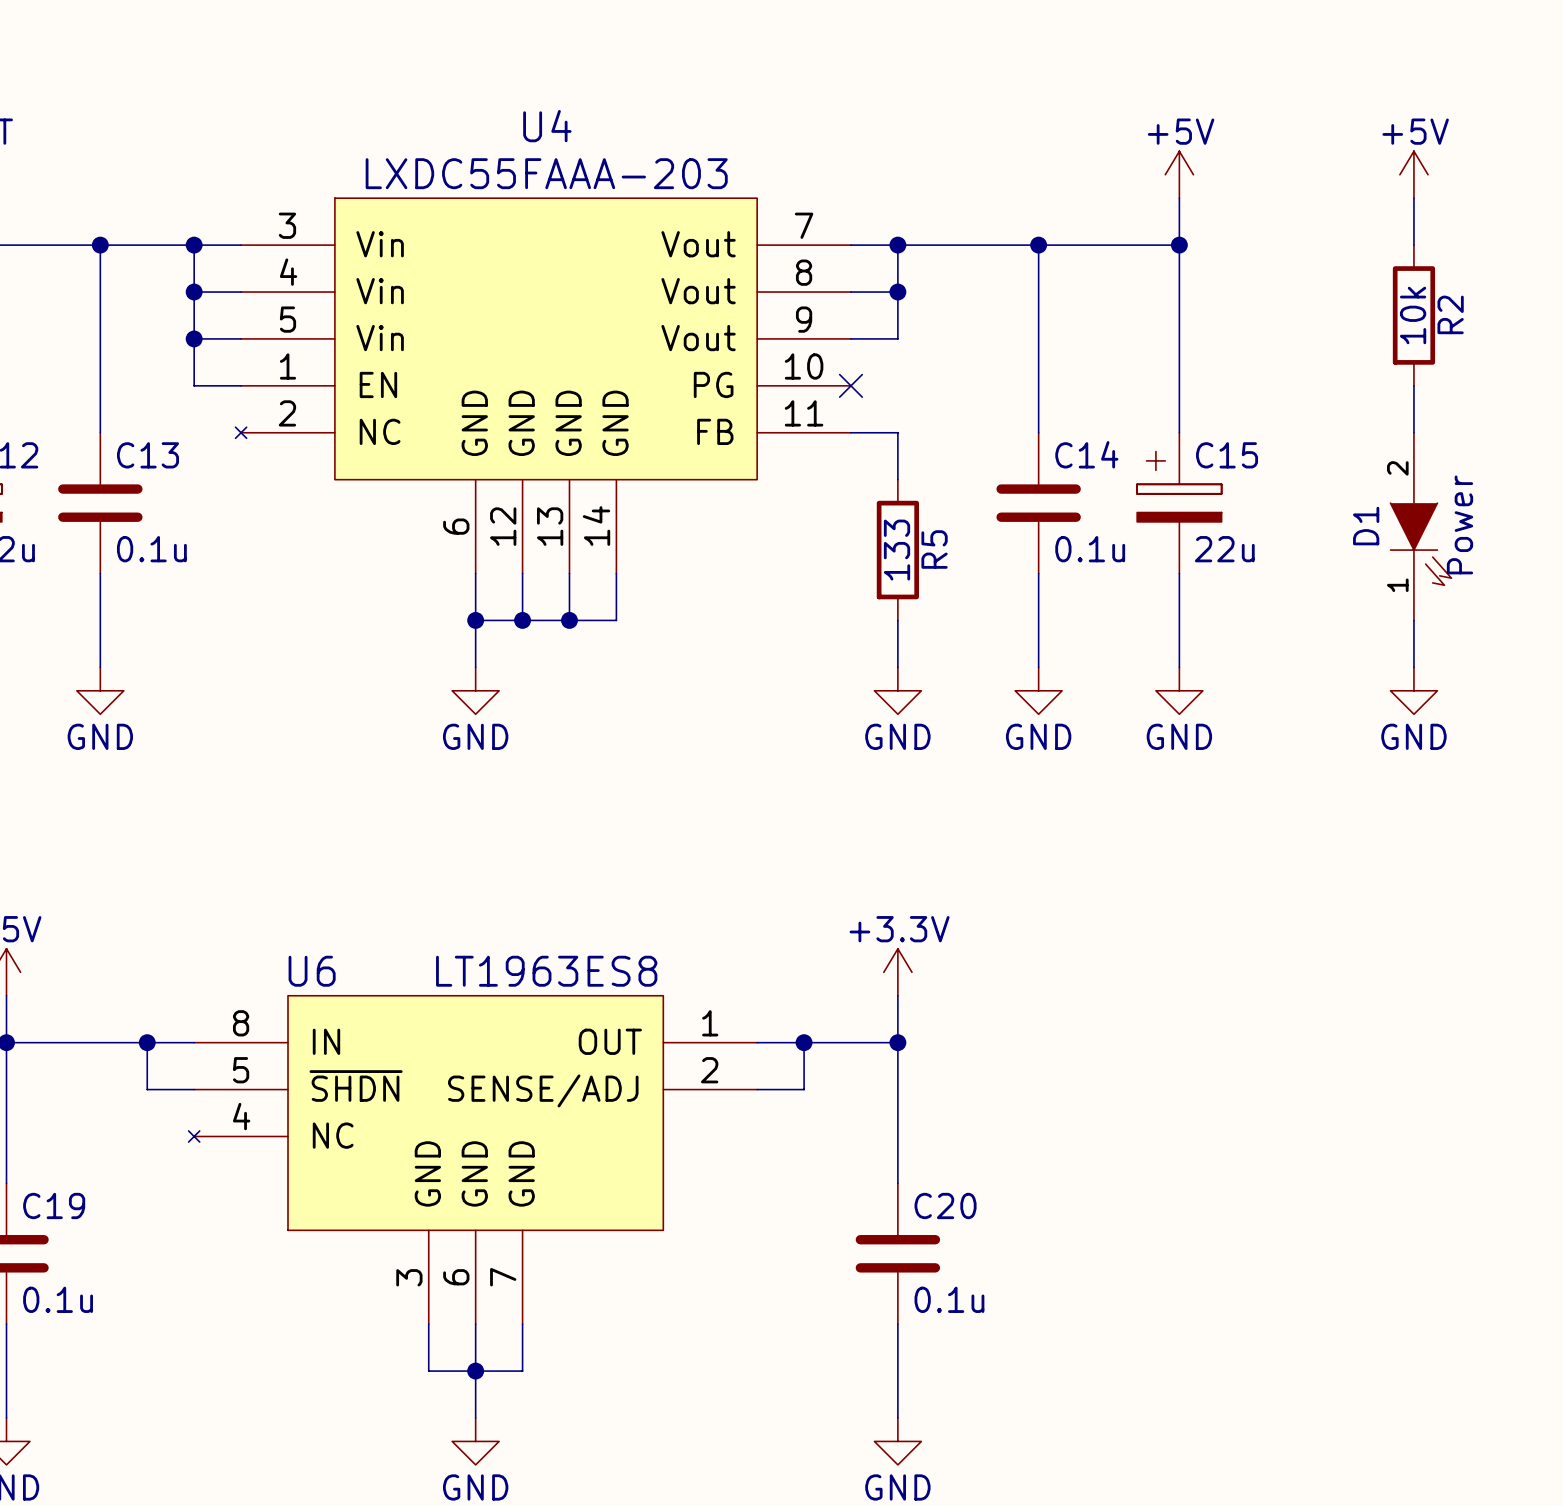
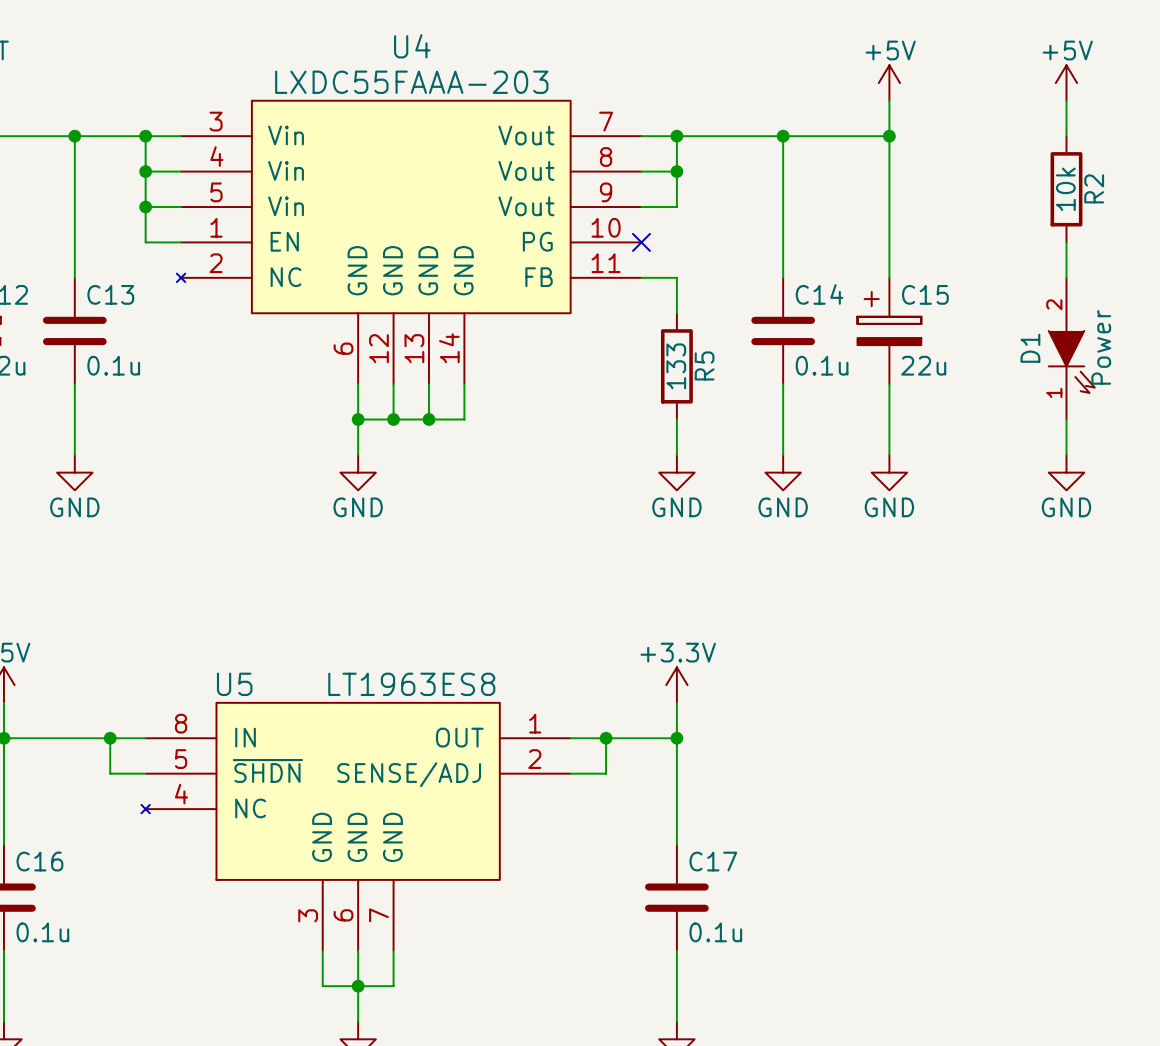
U6 name: U6 (312, 971) -> U5 (234, 684)
C19 name: C19 (54, 1205) -> C16 (39, 861)
C20 name: C20 (945, 1205) -> C17 (713, 861)

